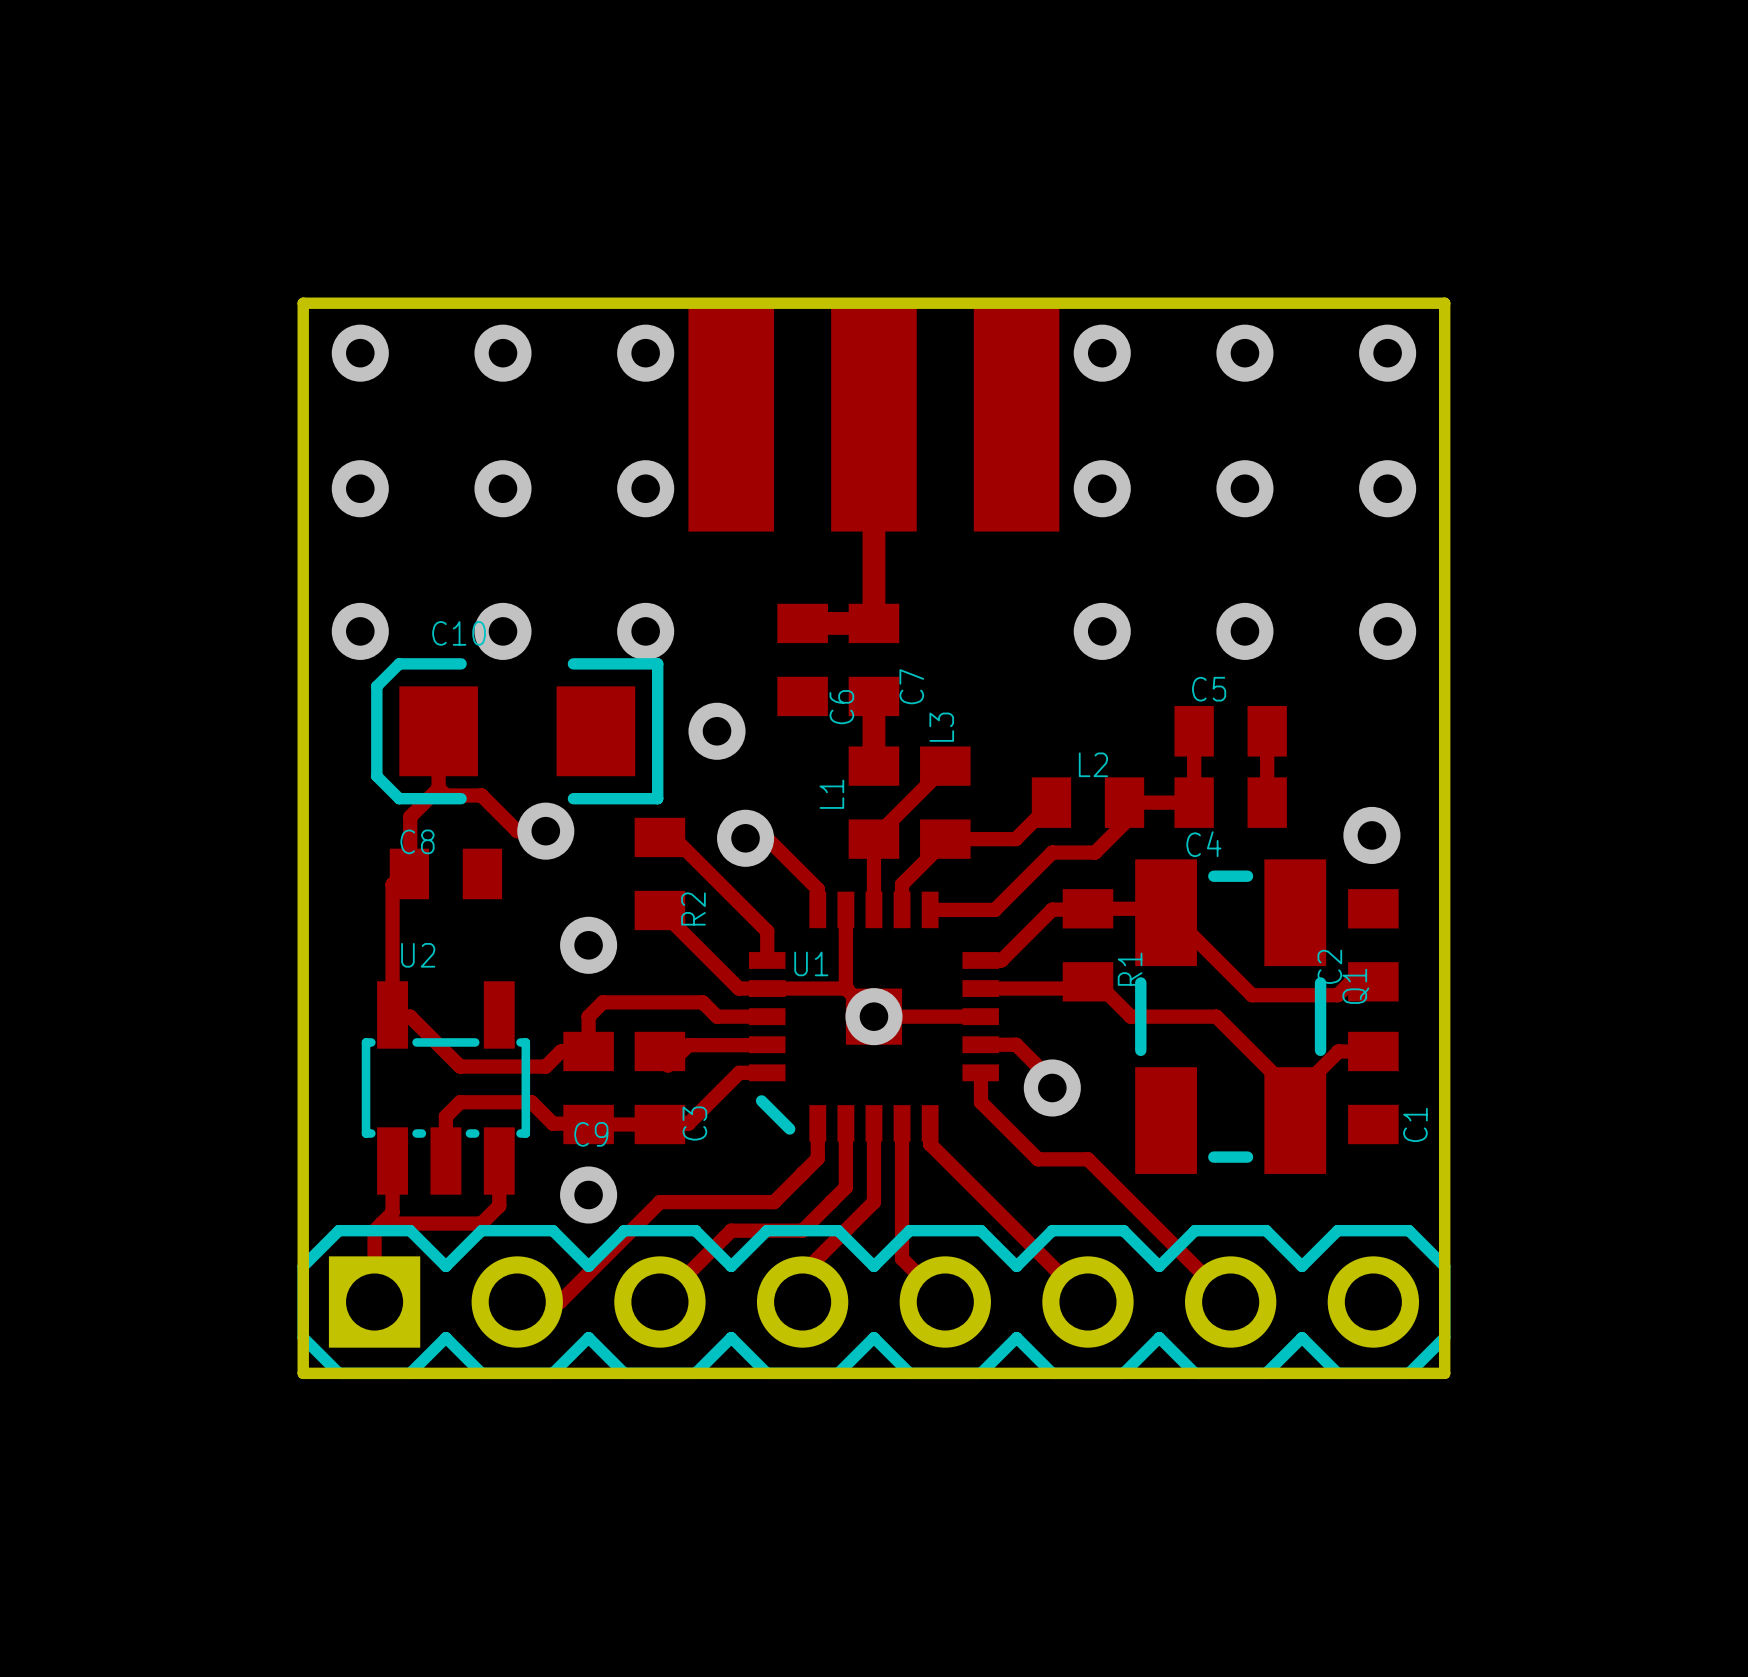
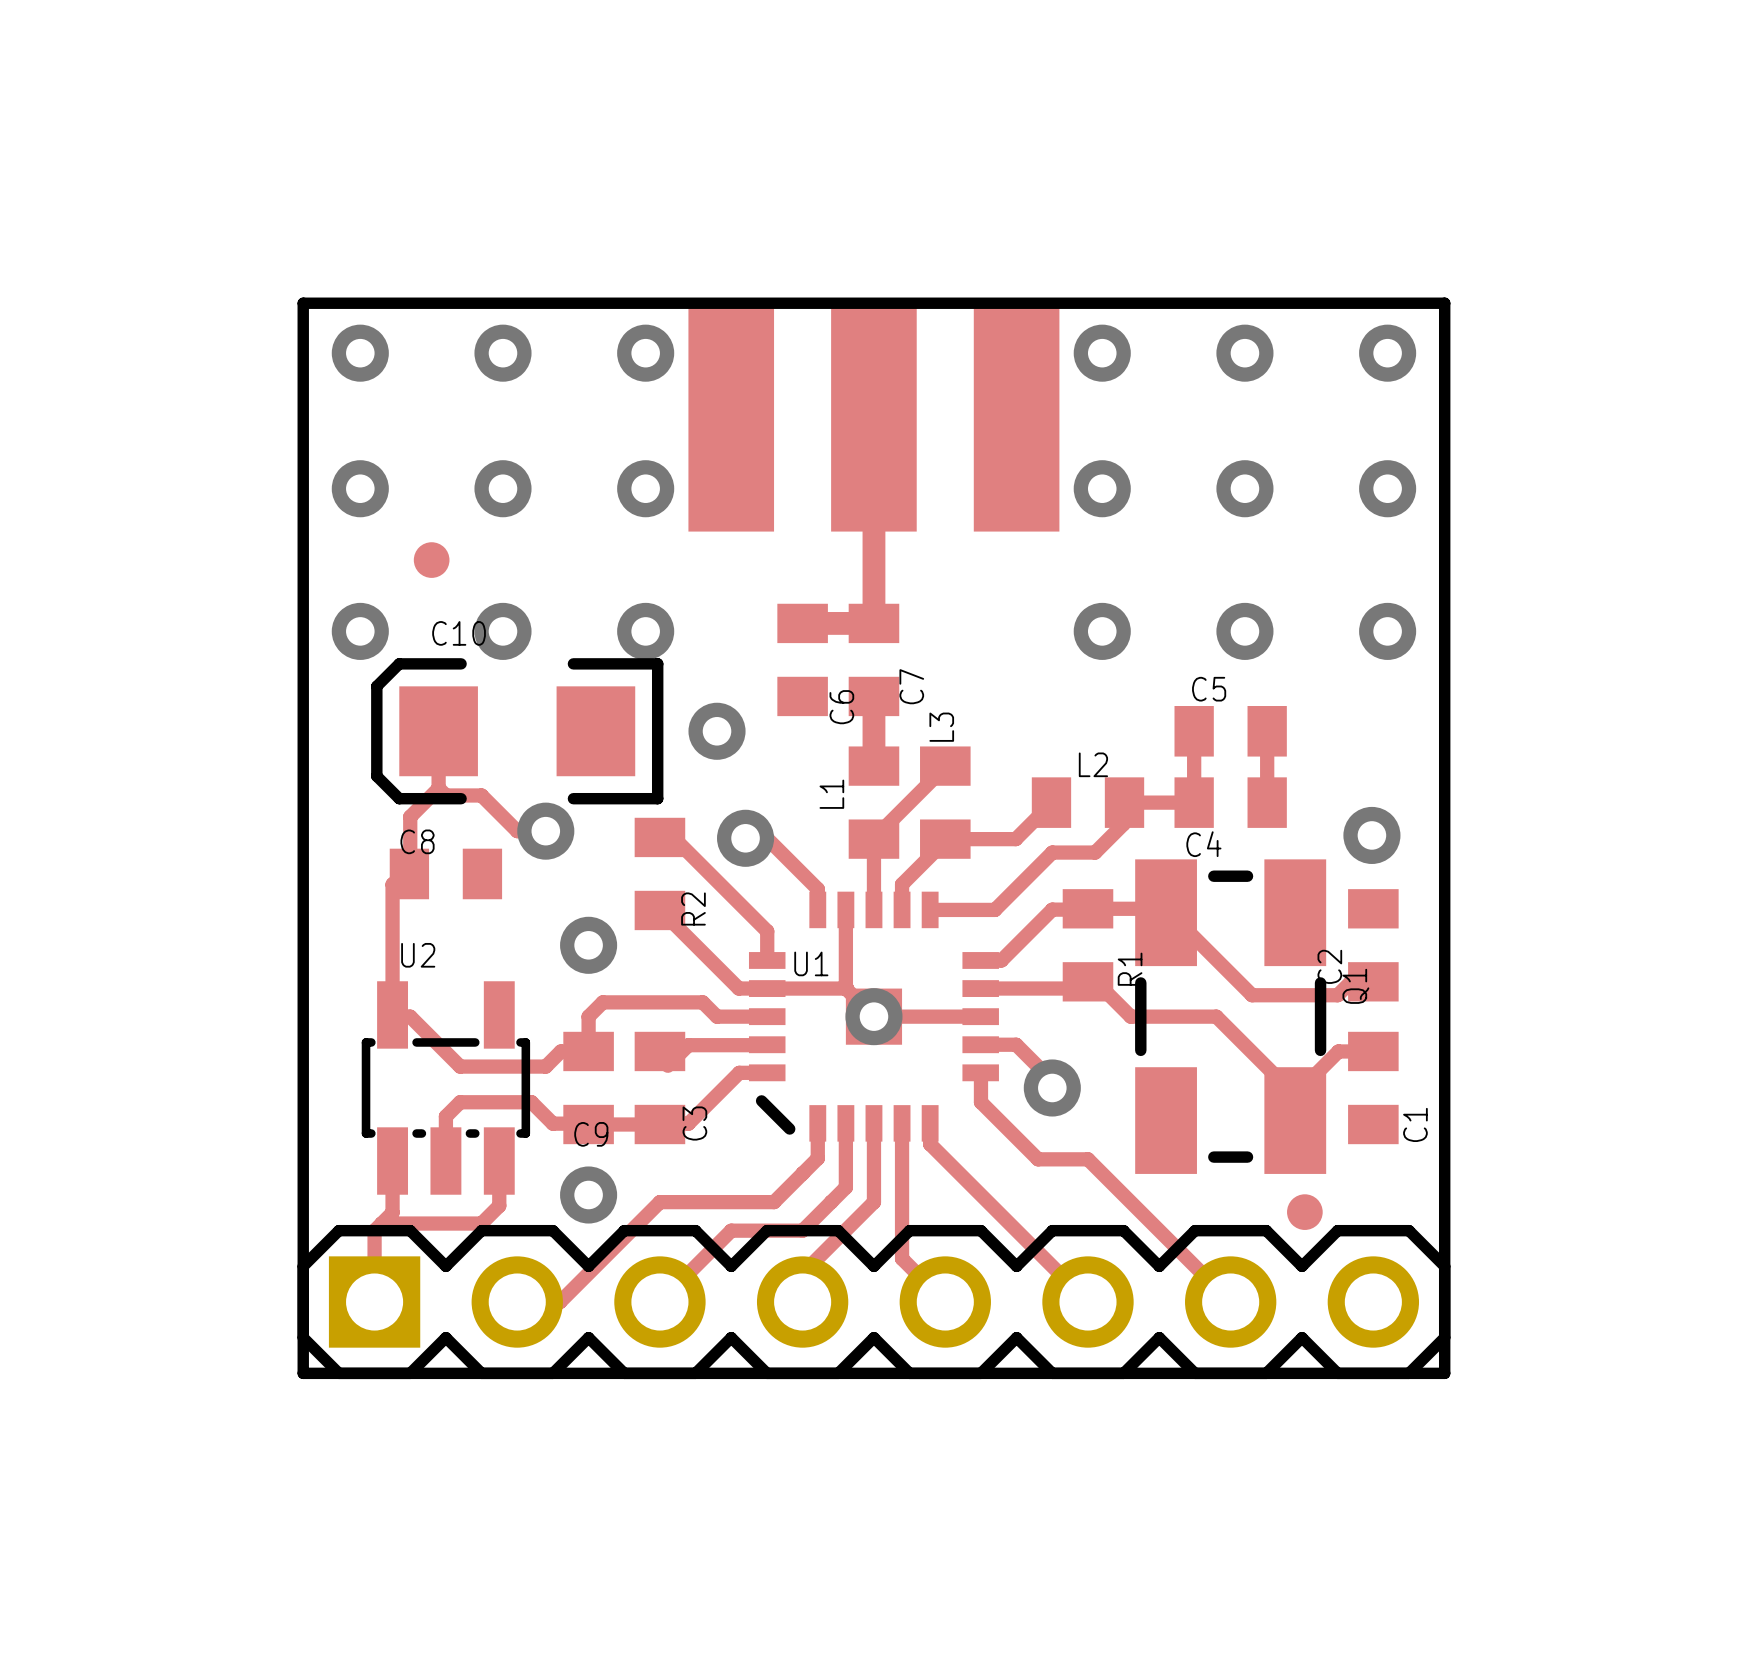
part: none -> (431, 560)
part: none -> (1304, 1212)

